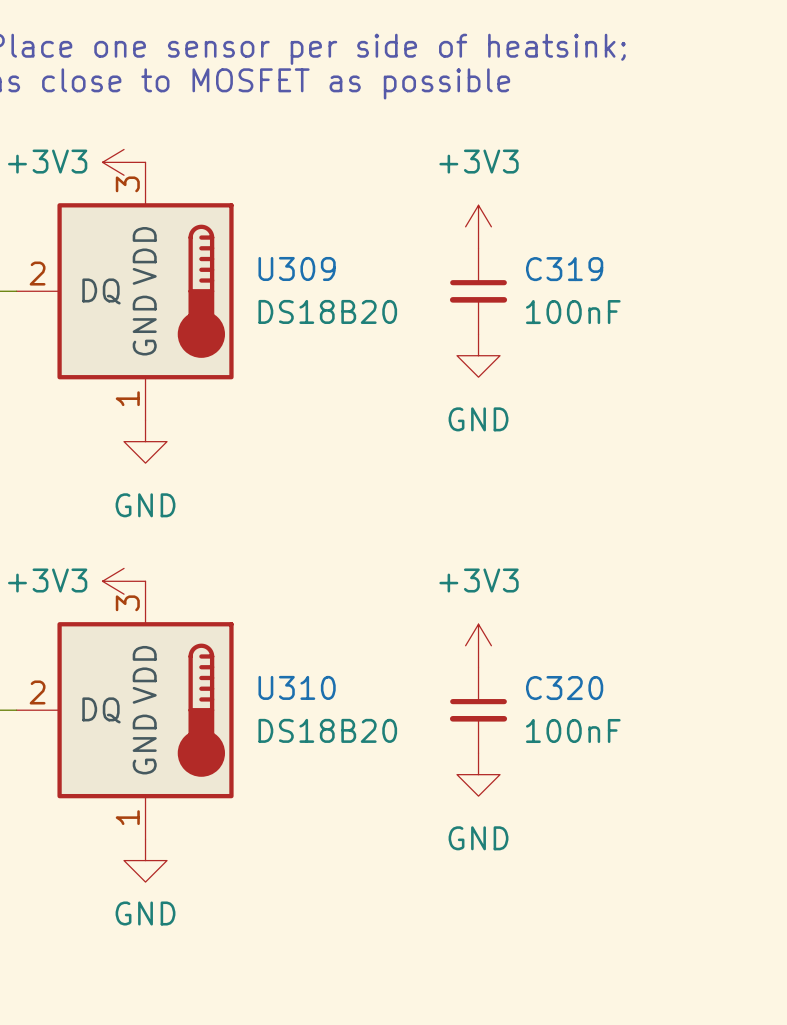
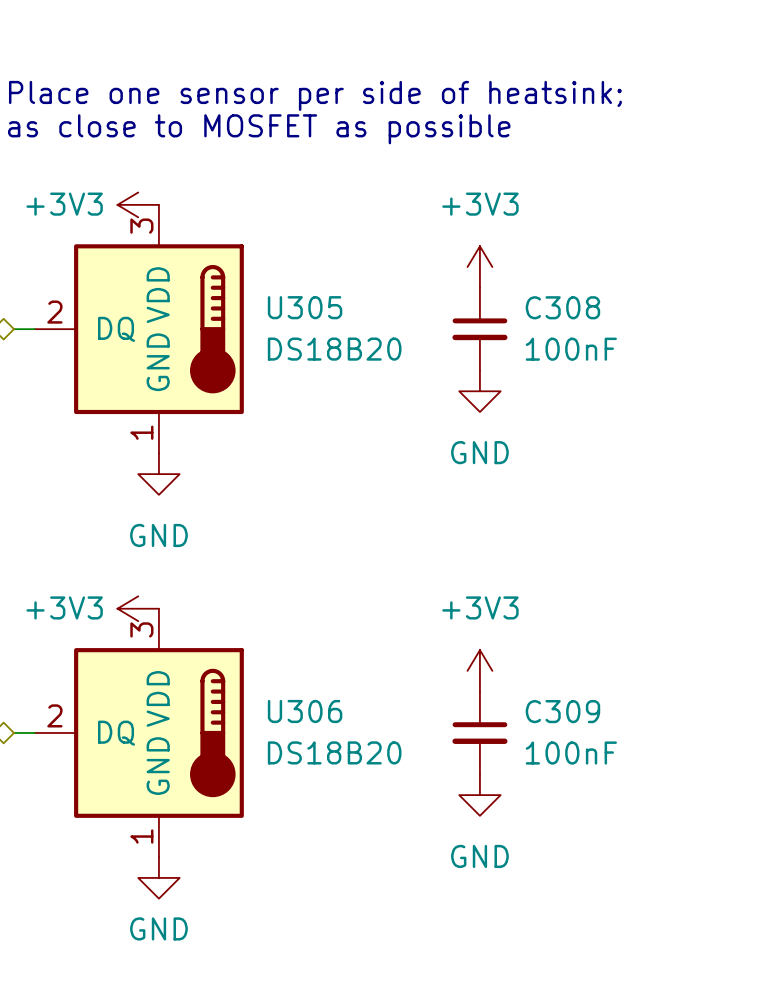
U309 name: U309 (297, 268) -> U305 (305, 307)
C319 name: C319 (564, 269) -> C308 (562, 307)
U310 name: U310 (297, 687) -> U306 (305, 711)
C320 name: C320 (564, 688) -> C309 (562, 711)

